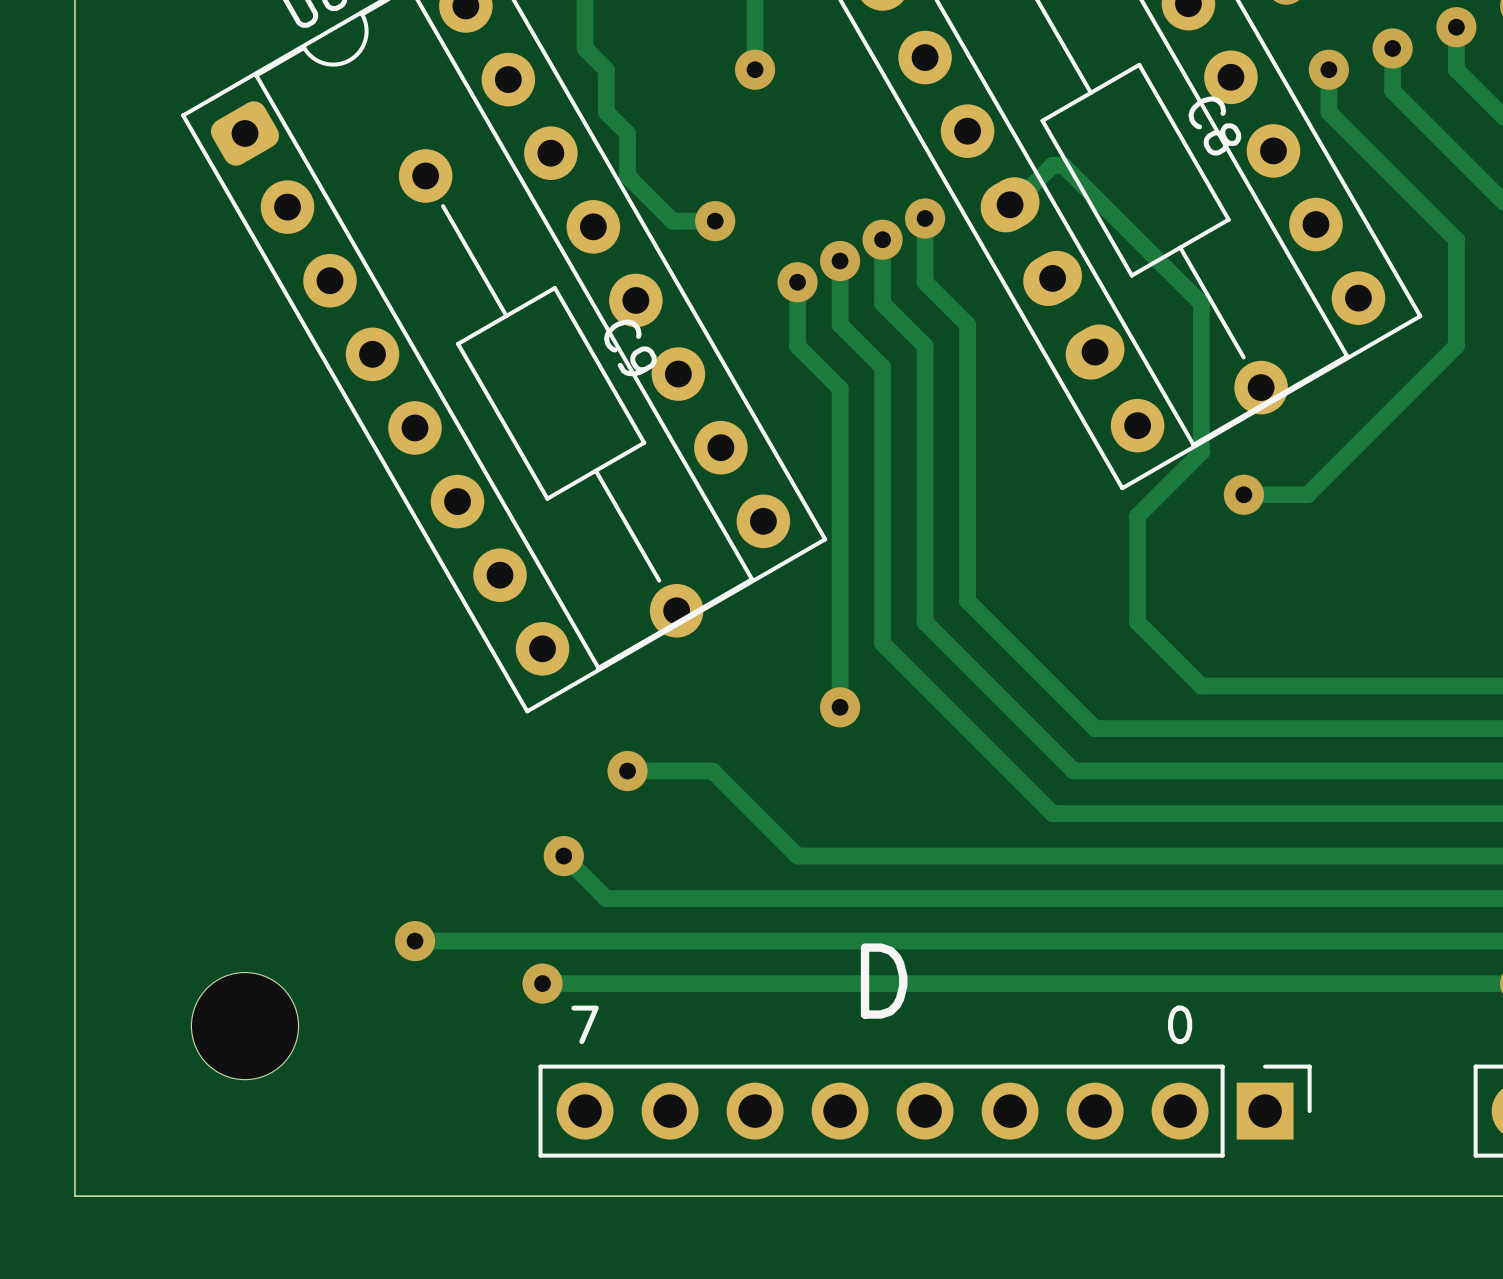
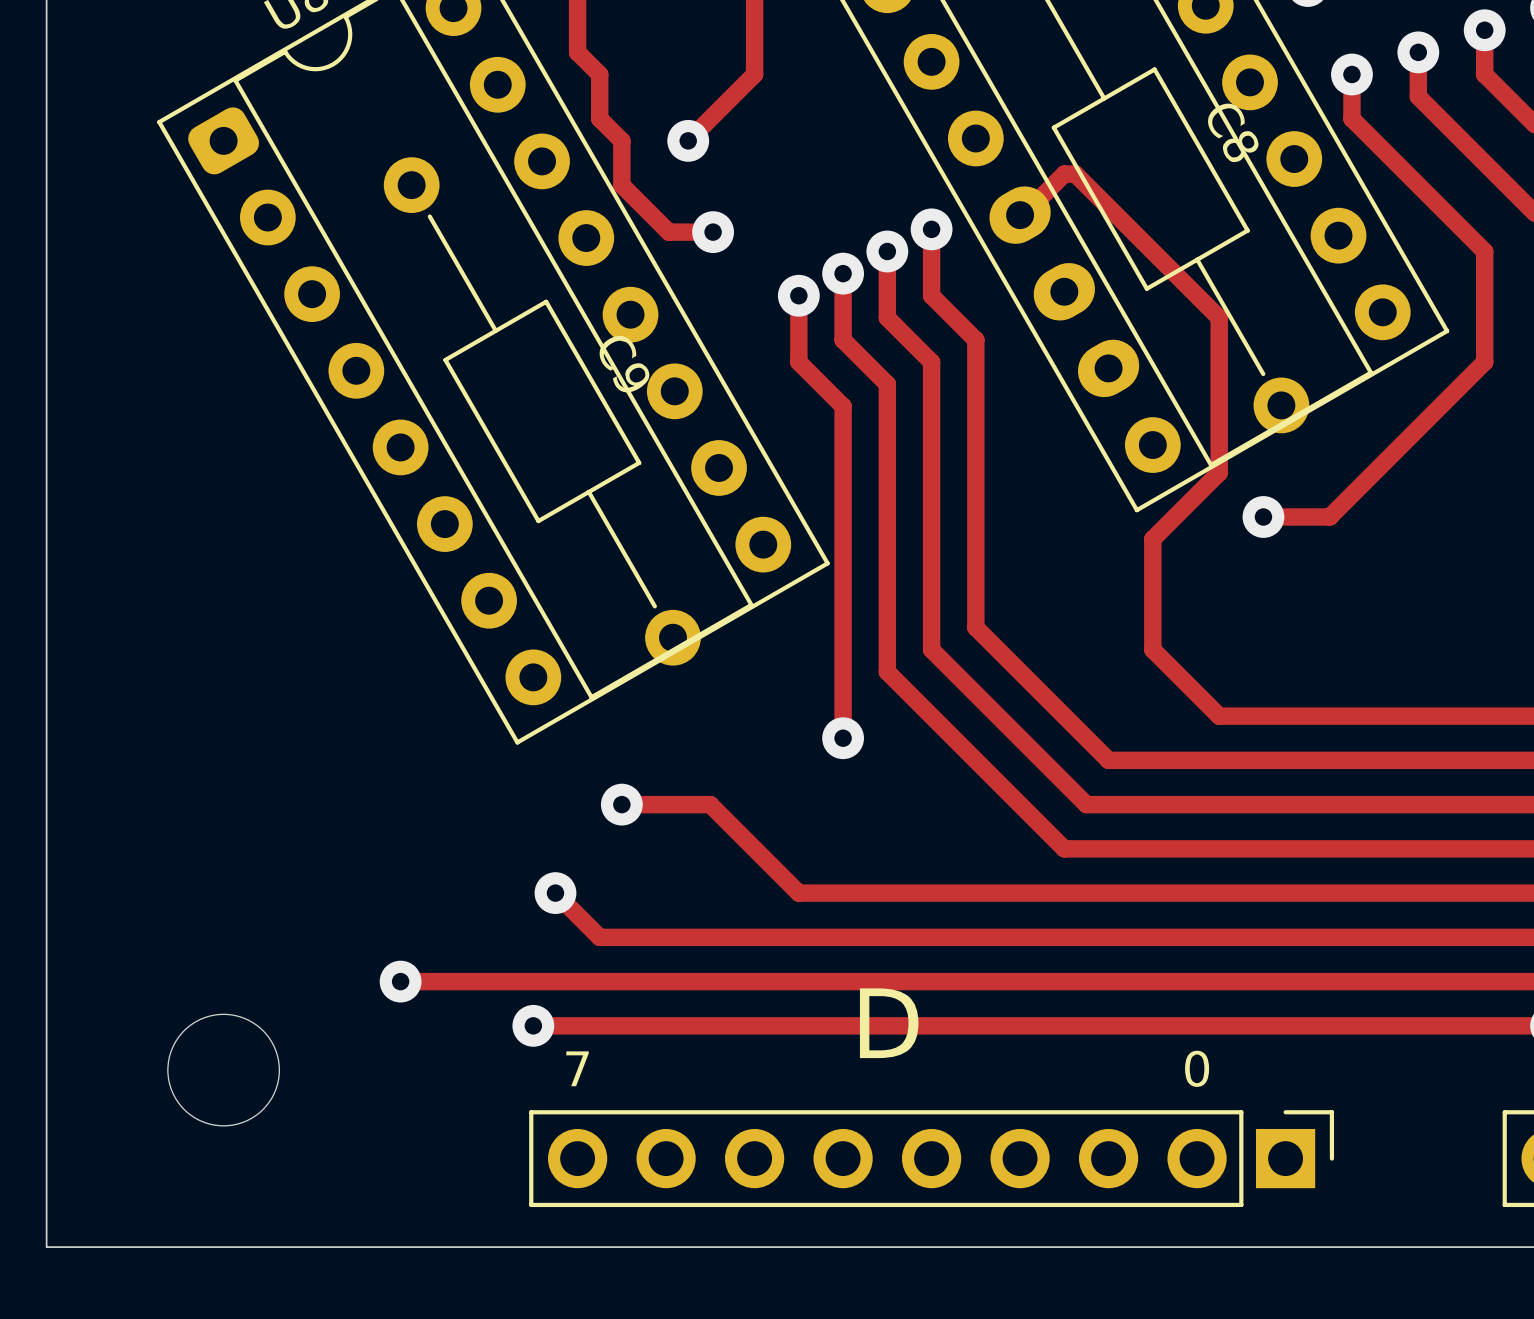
track: none -> (754, 74) (688, 140)
via position: (755, 69) -> (688, 140)

